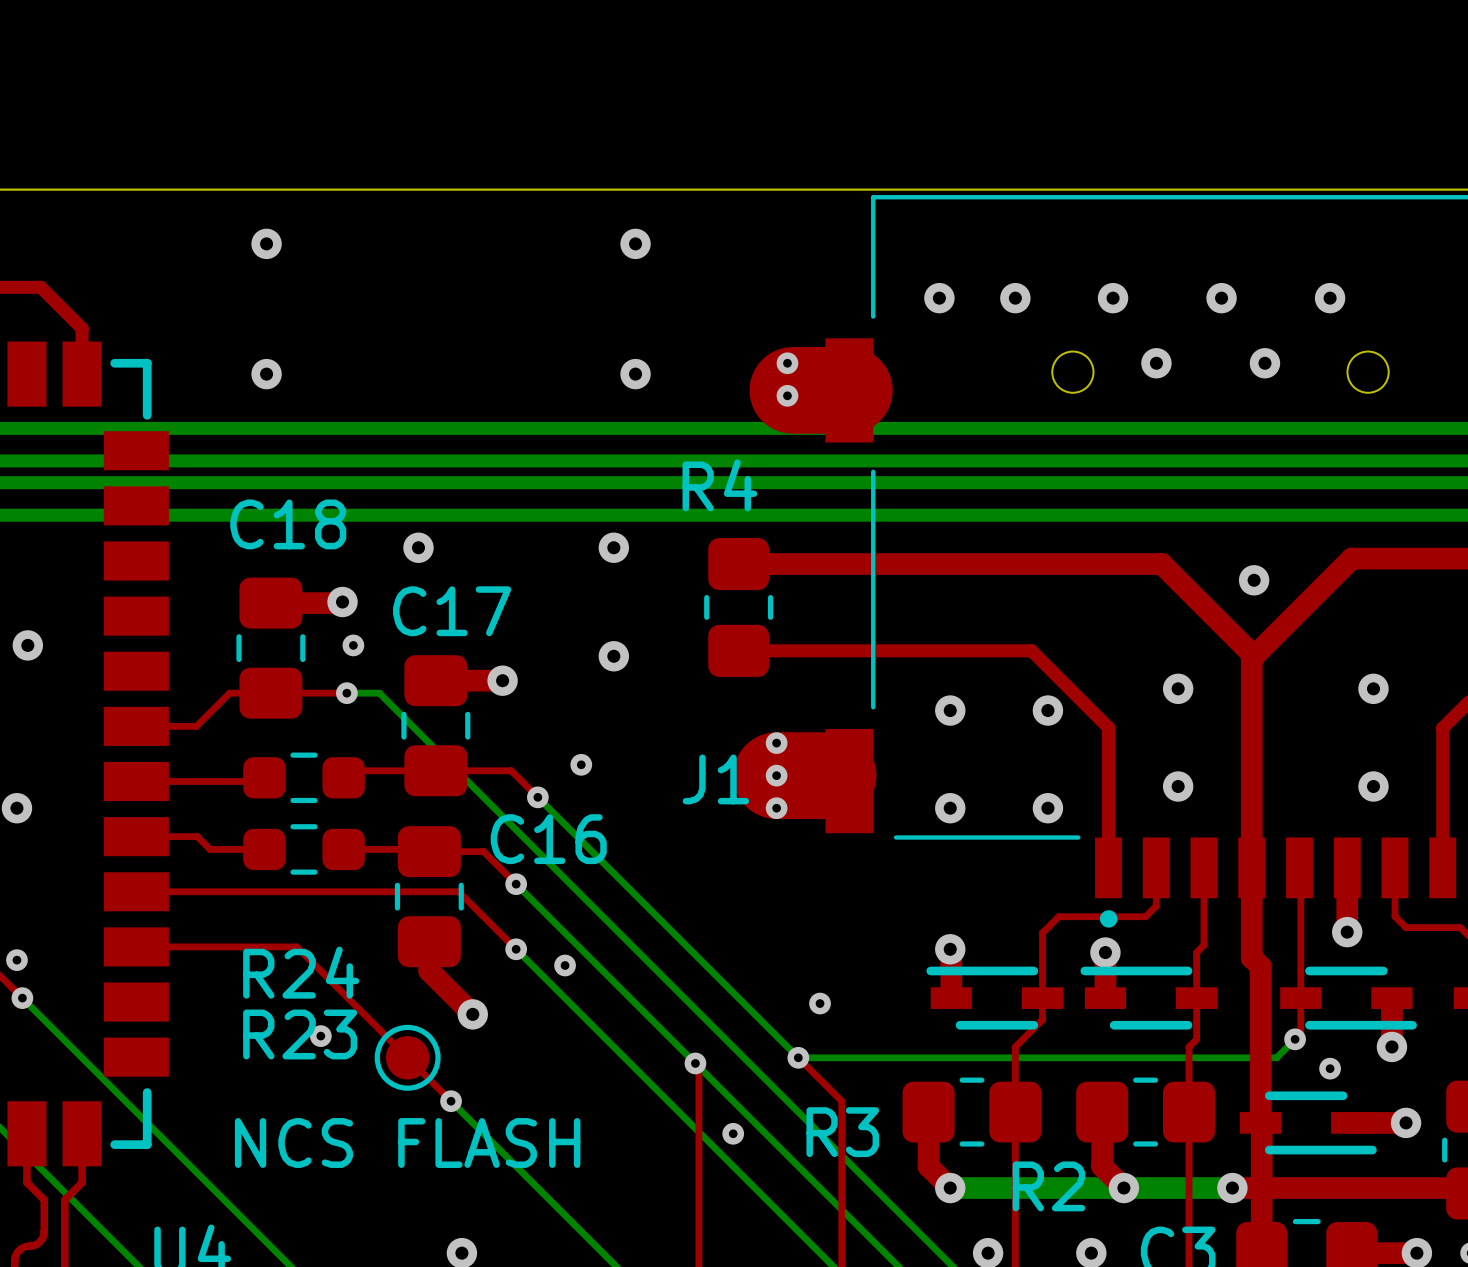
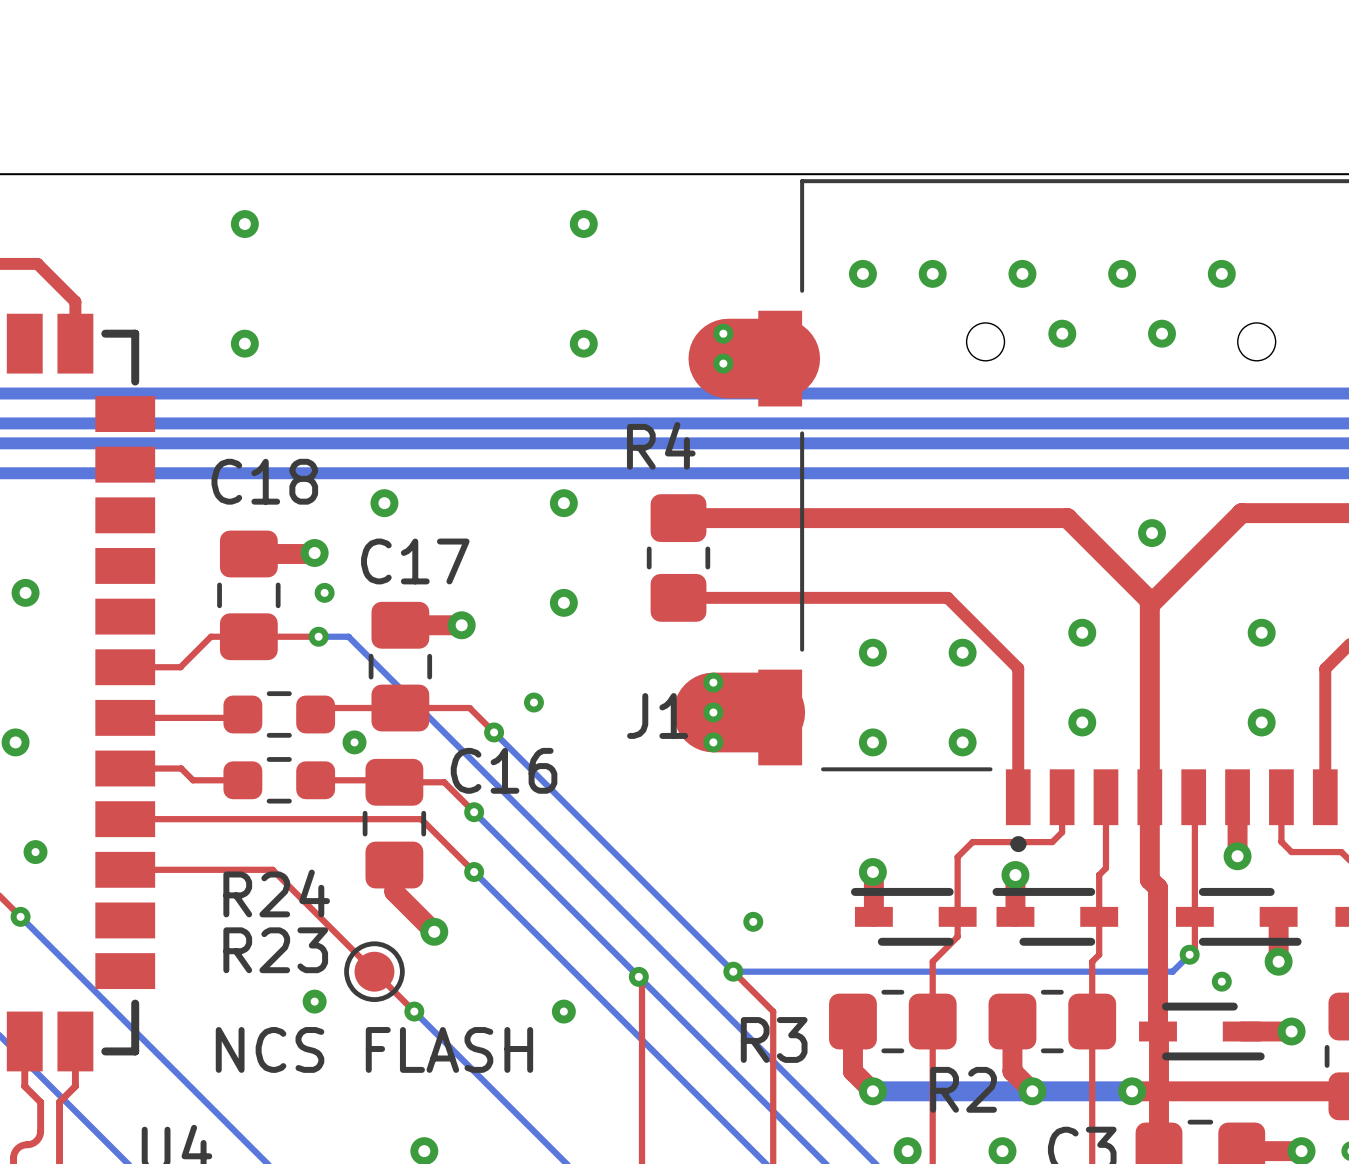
via: none -> (354, 742)
via: none -> (35, 852)
via: (16, 960) -> none
via: (565, 965) -> none
via: (320, 1036) -> none
via: none -> (314, 1001)
via: none -> (563, 1011)
via: (733, 1133) -> none

